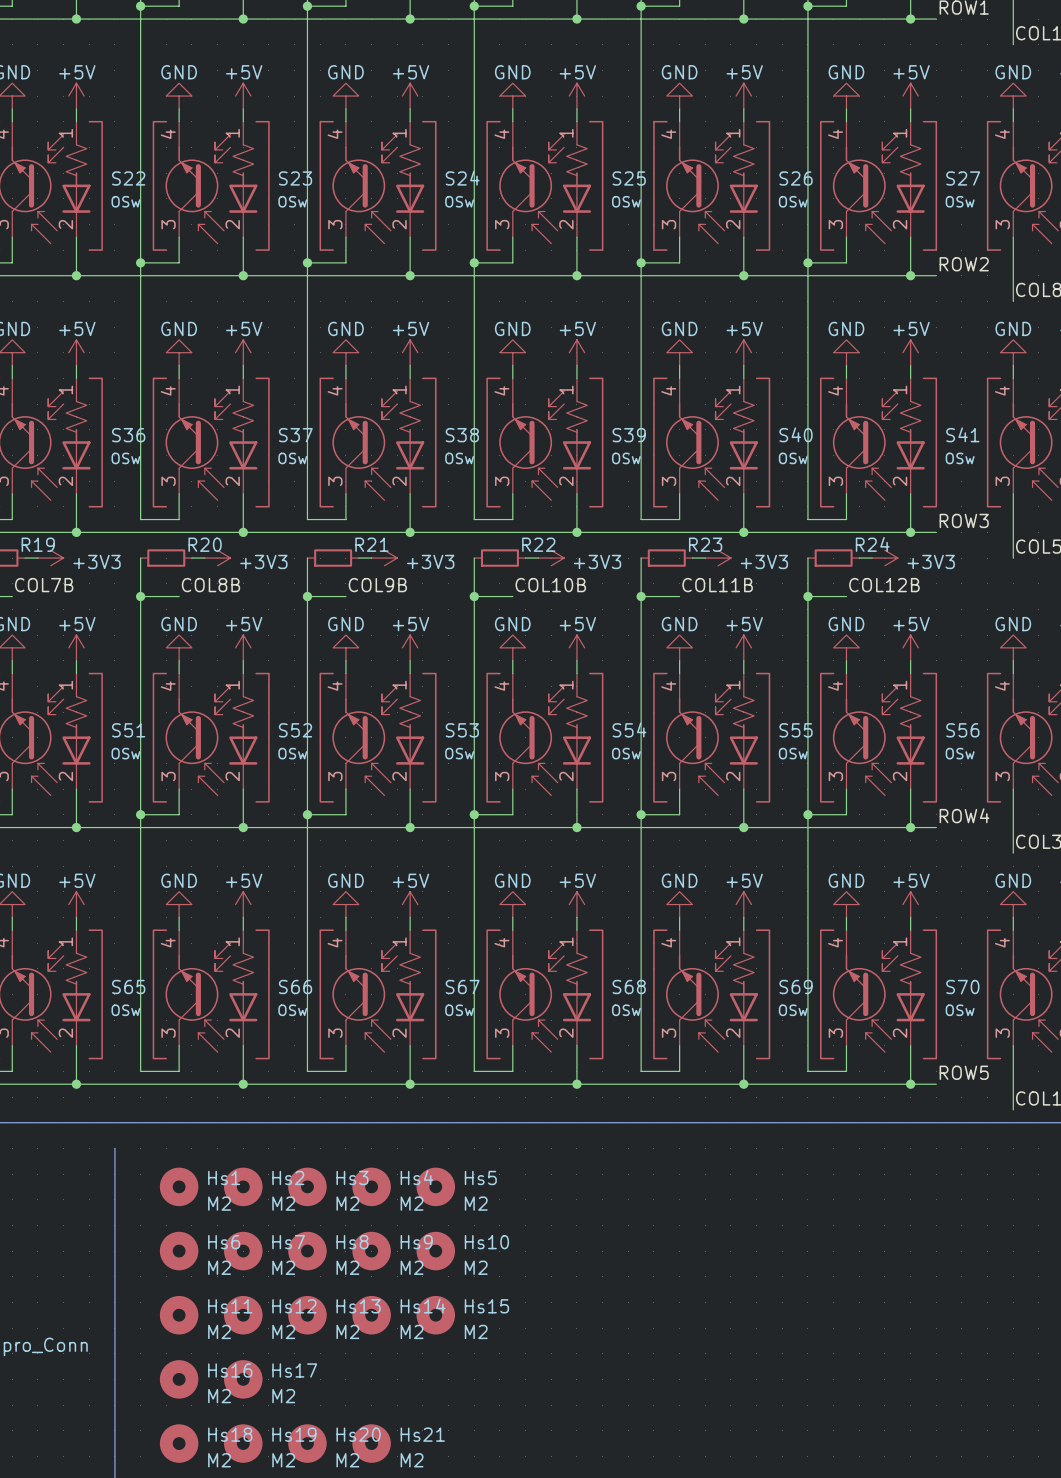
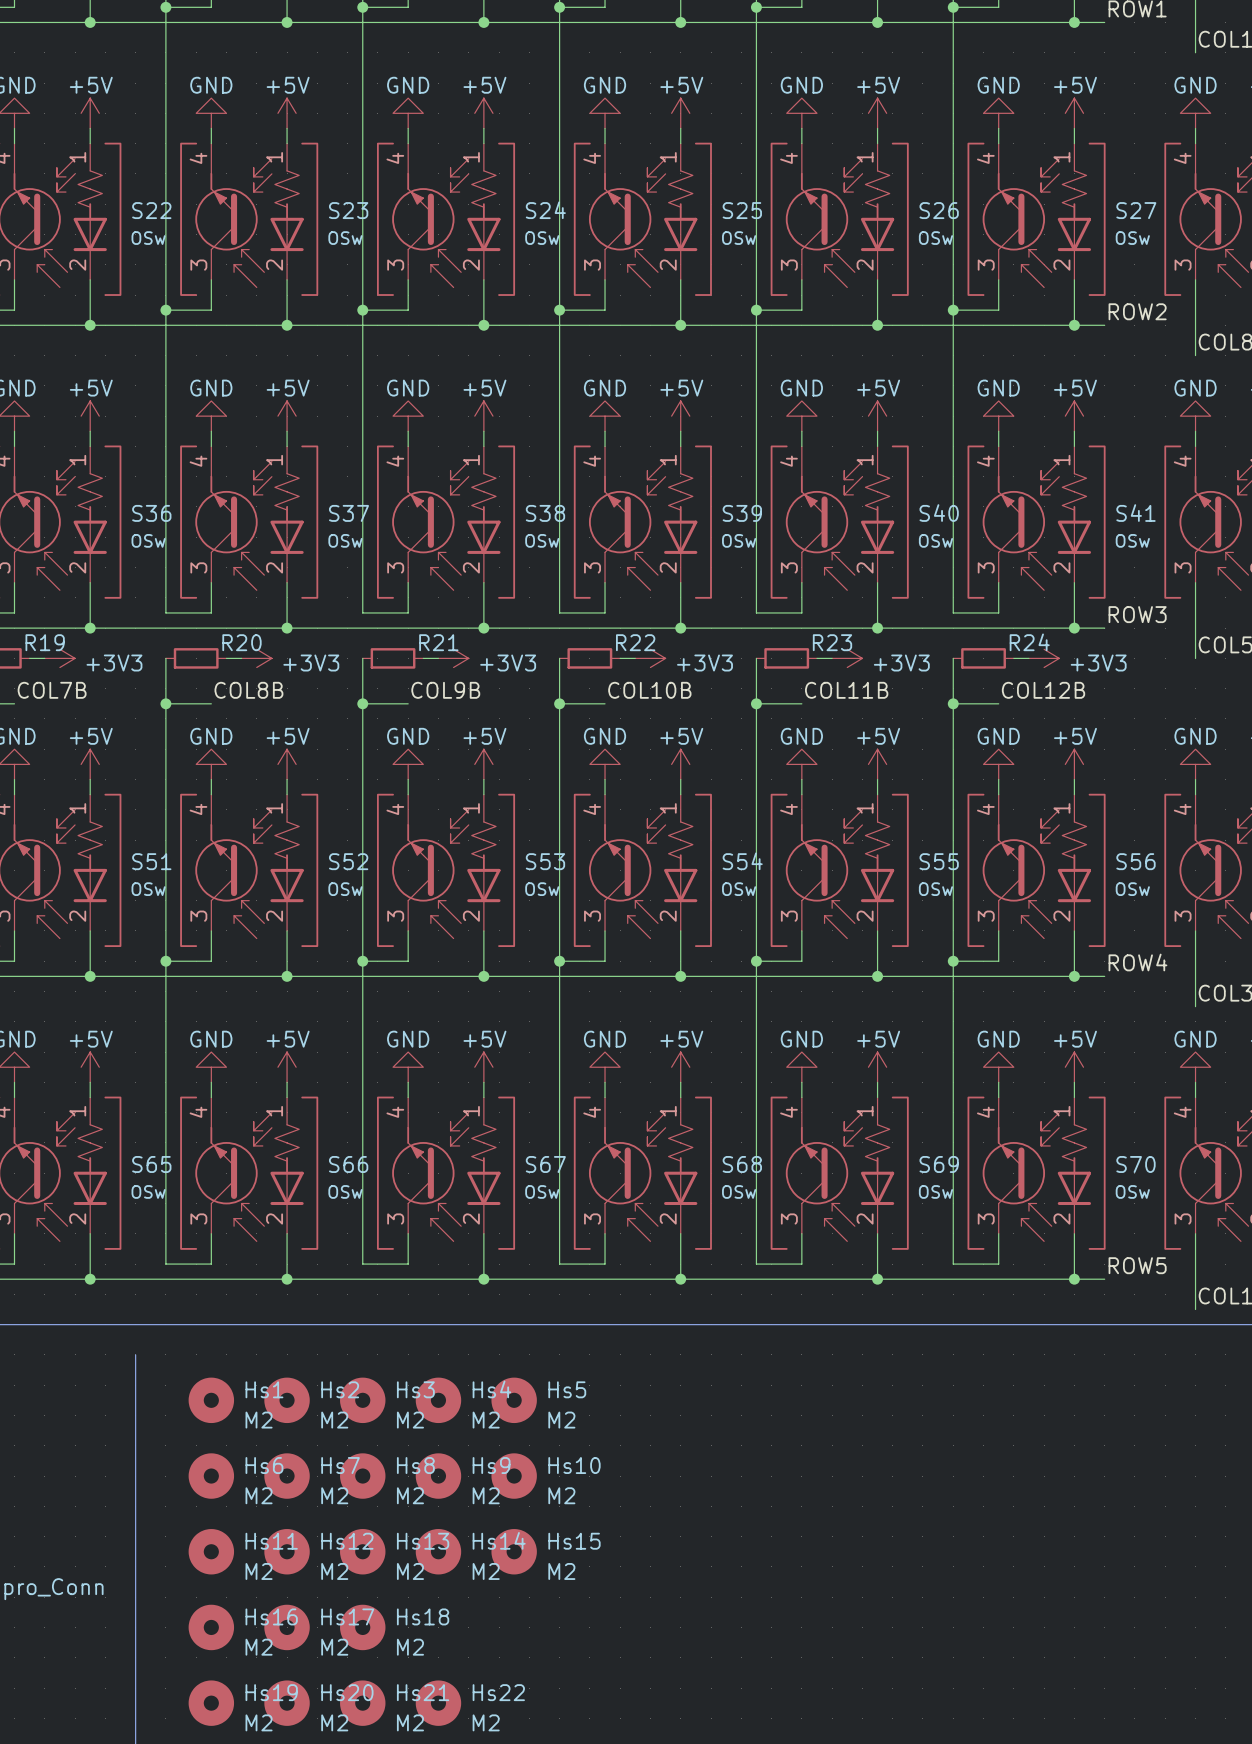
Hs18: none -> M2 (362, 1627)
Hs18 name: Hs18 (230, 1434) -> Hs19 (271, 1692)
Hs19 name: Hs19 (294, 1434) -> Hs20 (347, 1692)
Hs20 name: Hs20 (358, 1434) -> Hs21 (423, 1692)
Hs21 name: Hs21 (422, 1434) -> Hs22 (498, 1692)

